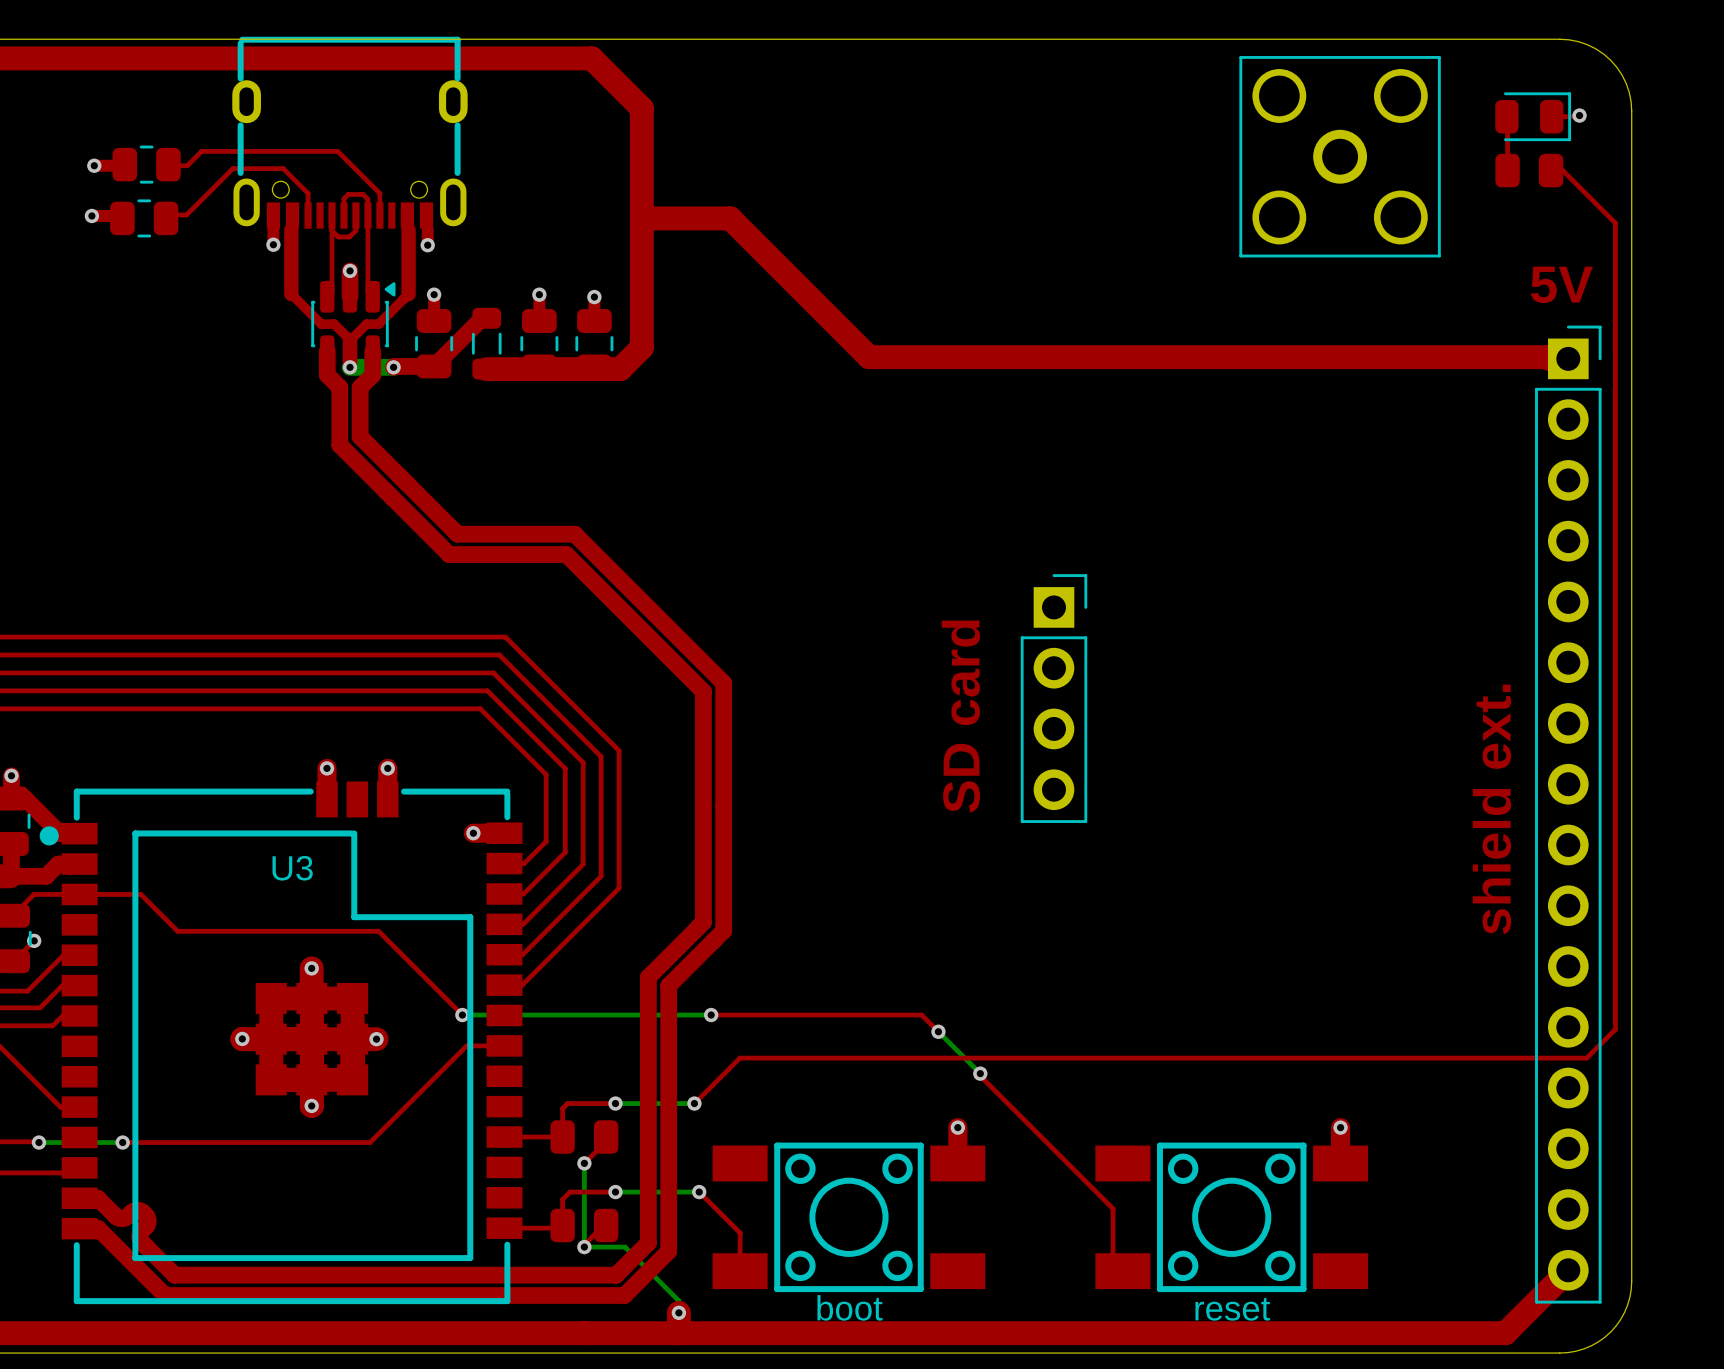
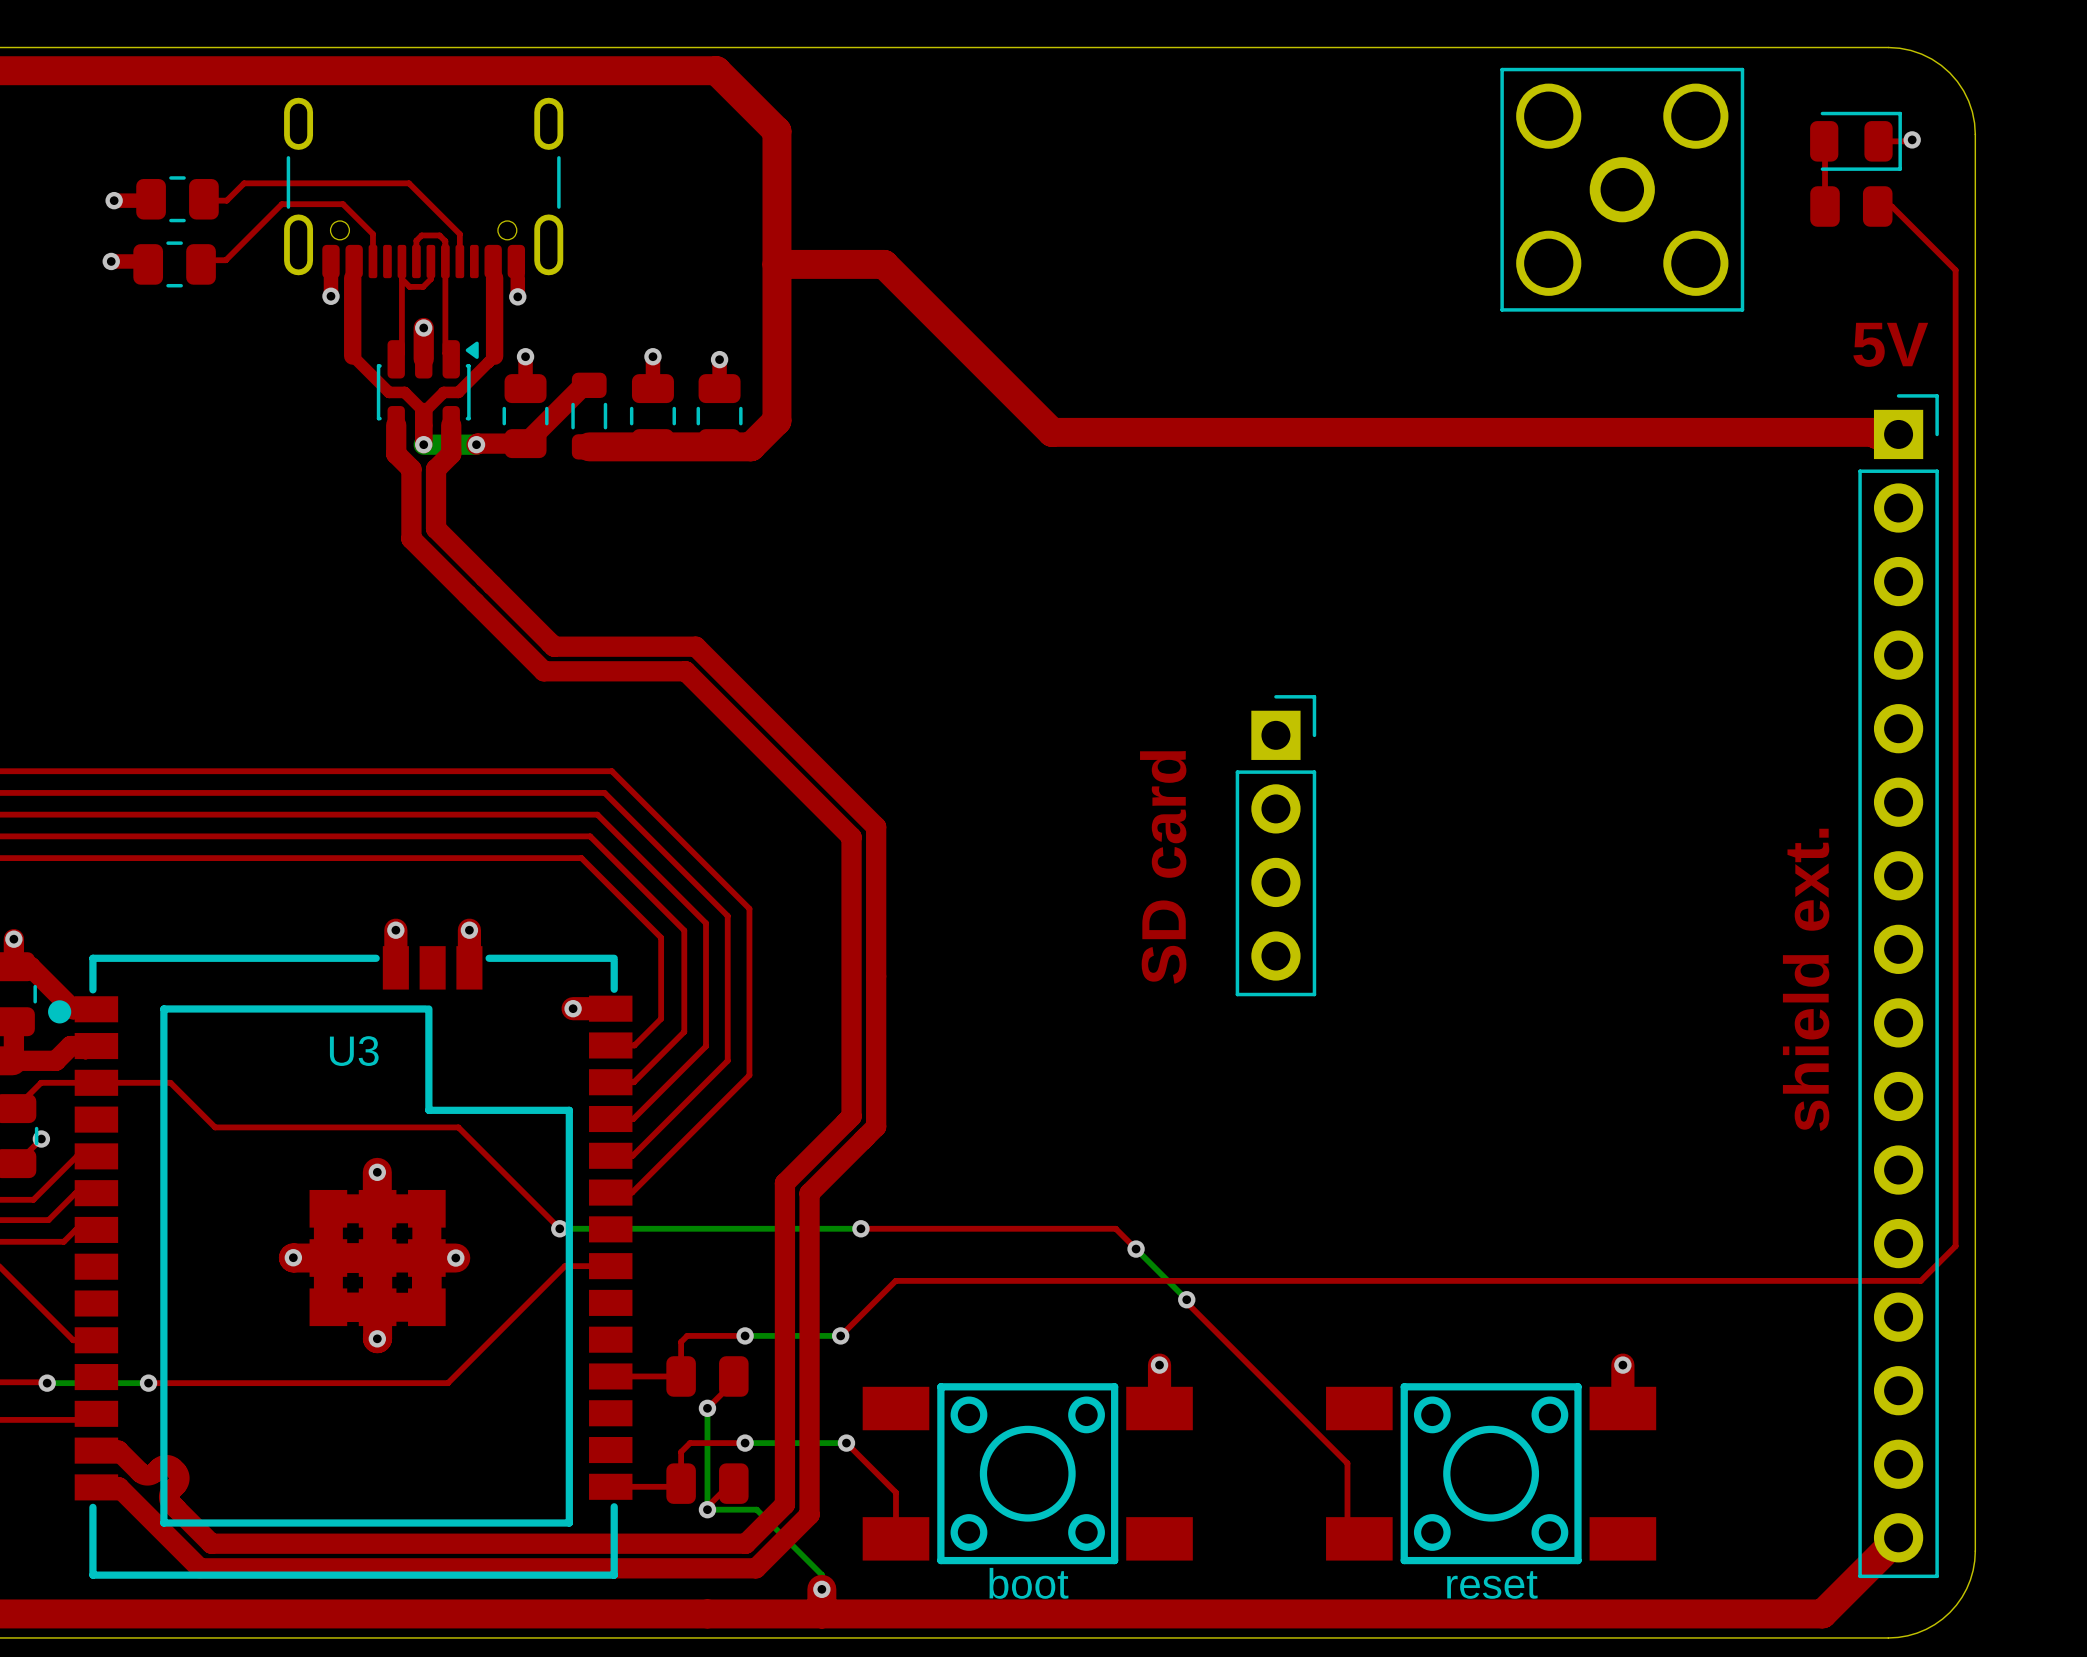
part footprint: [232, 36, 468, 229] -> [284, 97, 564, 279]

